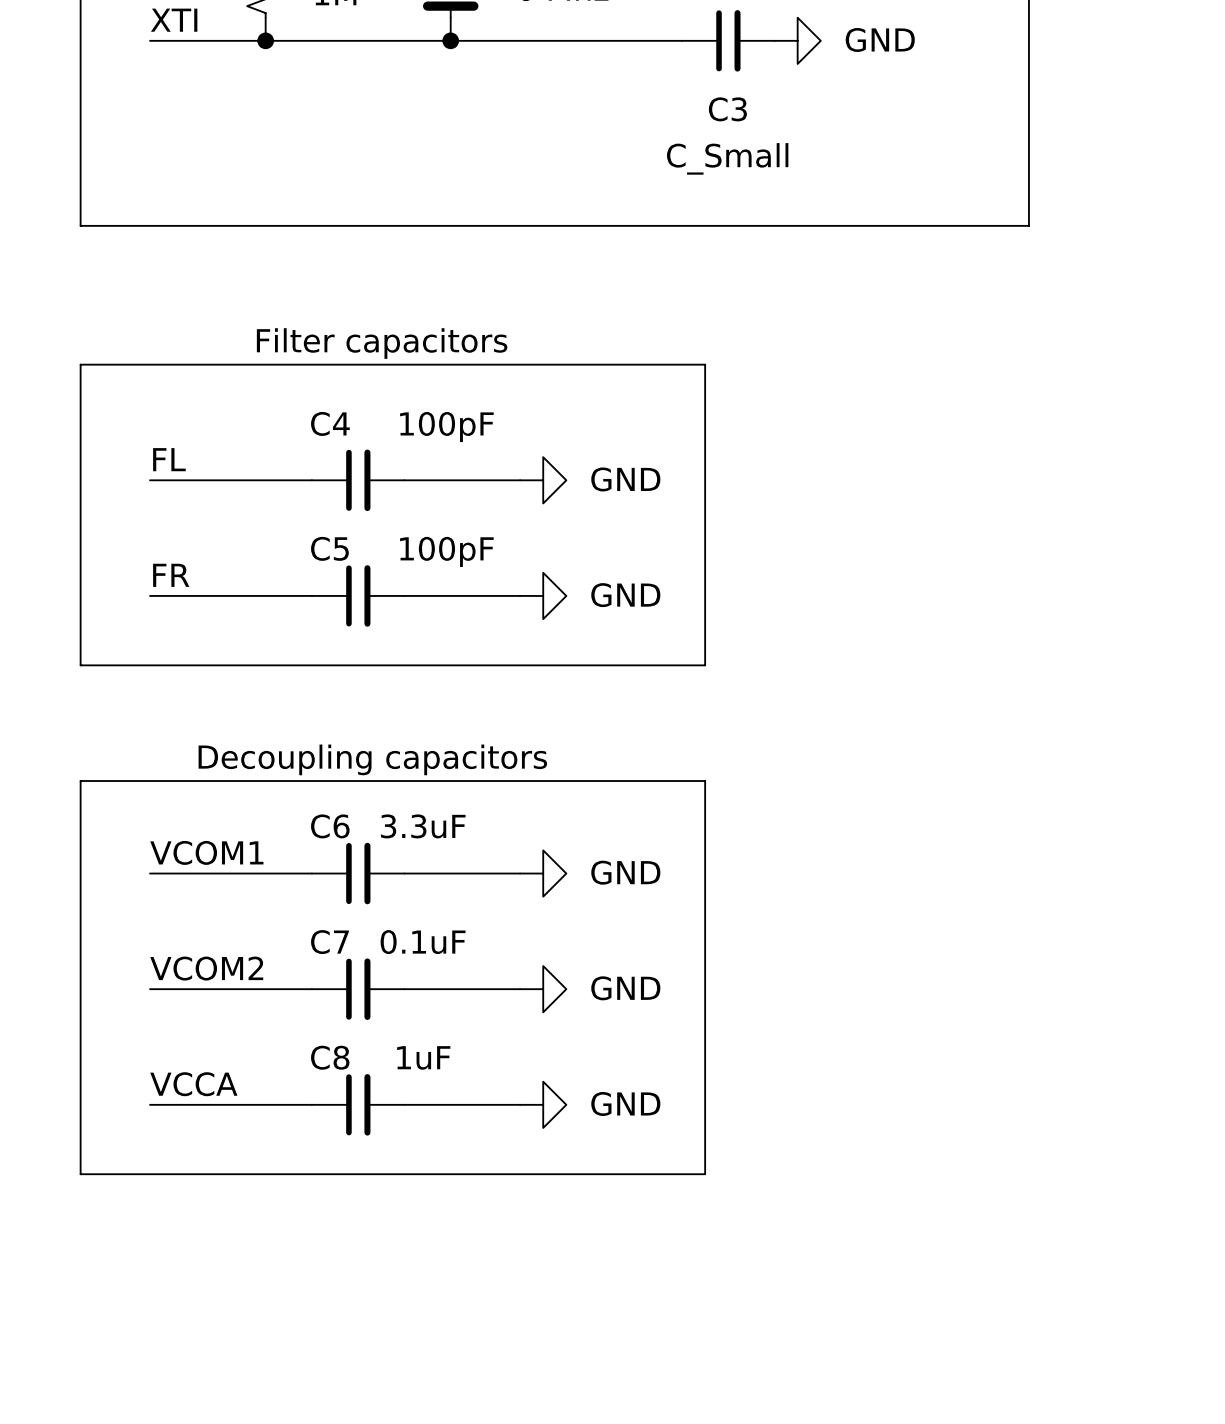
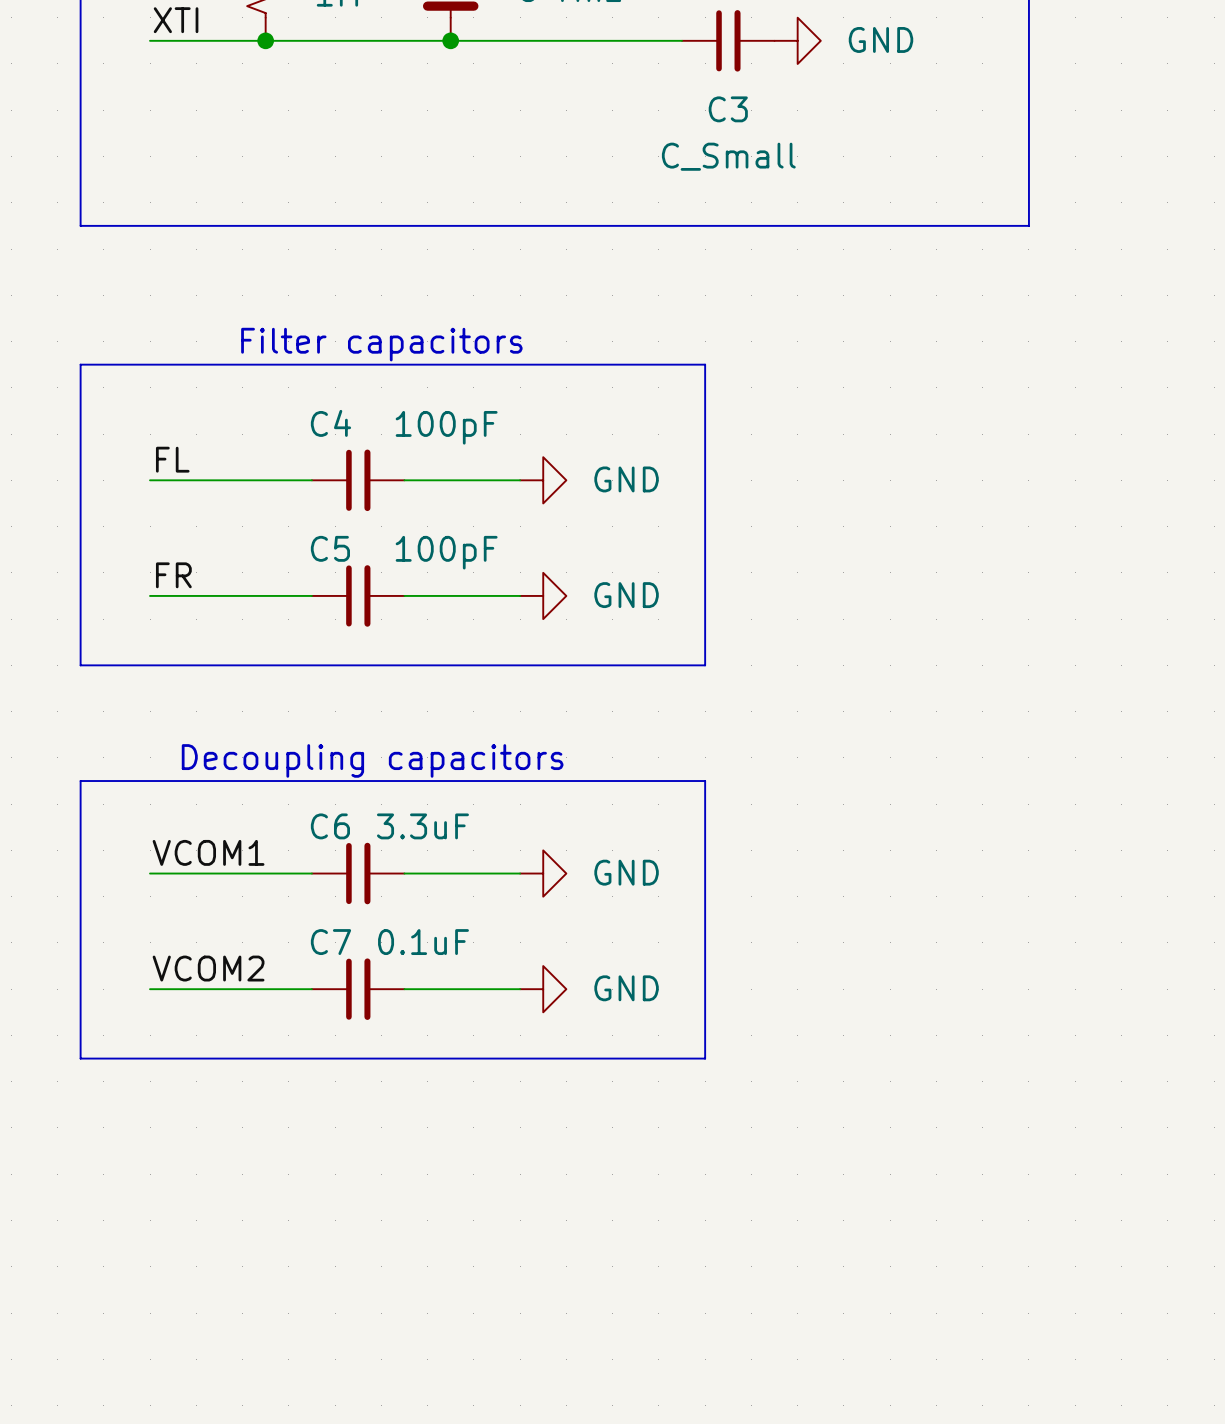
line: (80, 1058) (80, 1174) (705, 1174) (705, 1058) -> (80, 1058) (705, 1058)
label: VCCA (193, 1084) -> none
wire: (150, 1104) (311, 1104) -> none
C8: 1uF (358, 1104) -> none
wire: (404, 1104) (520, 1104) -> none
power symbol: GND (543, 1104) -> none

